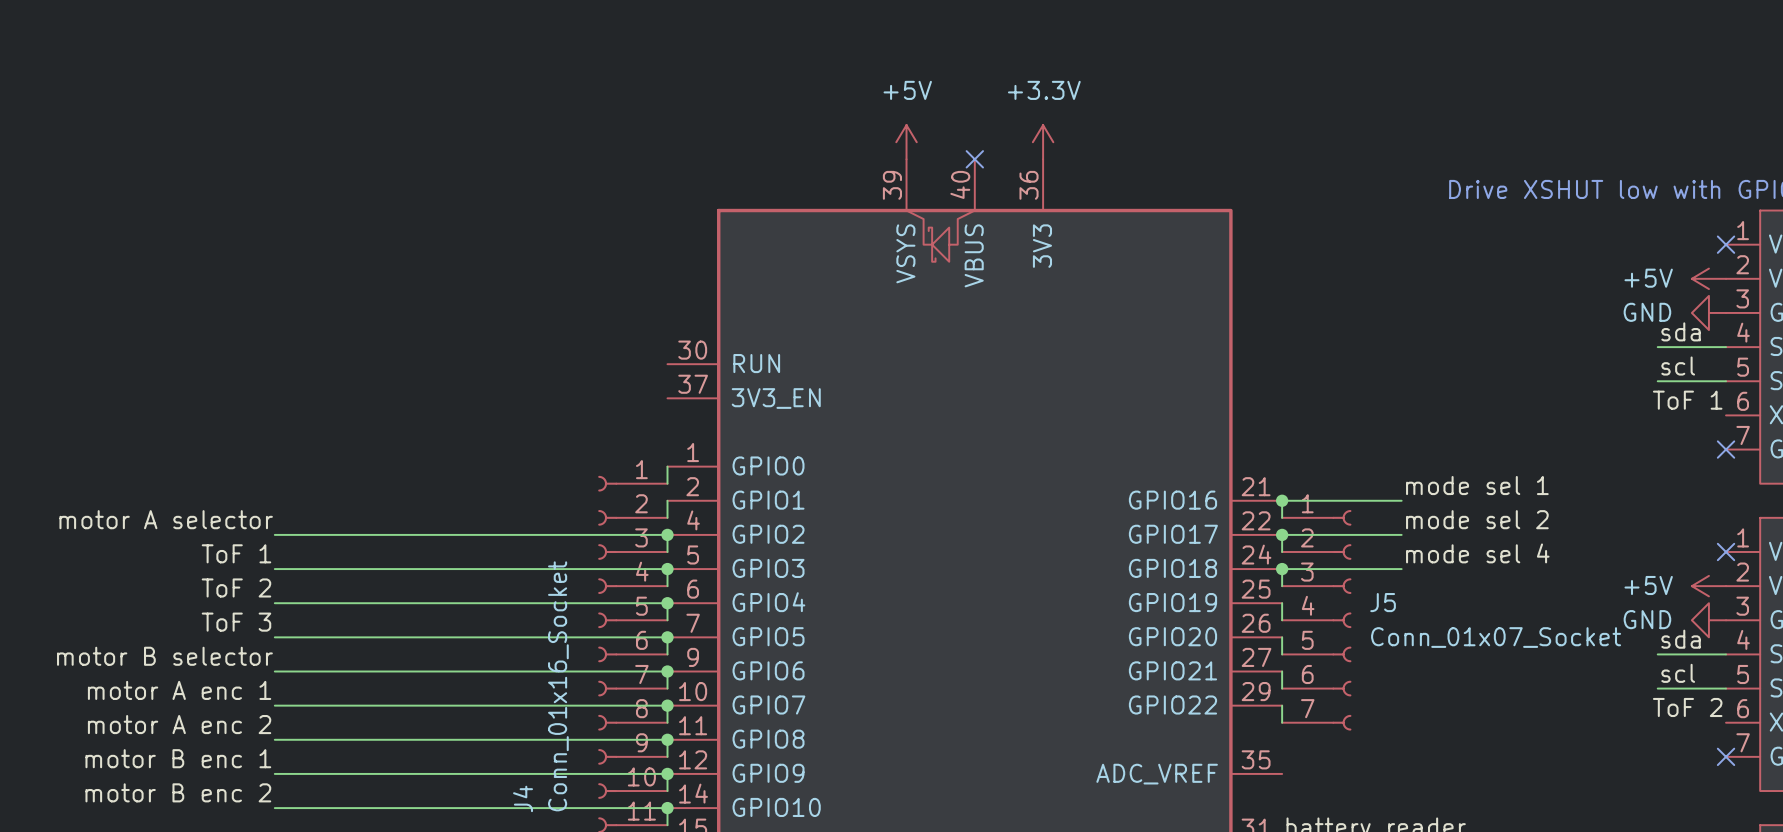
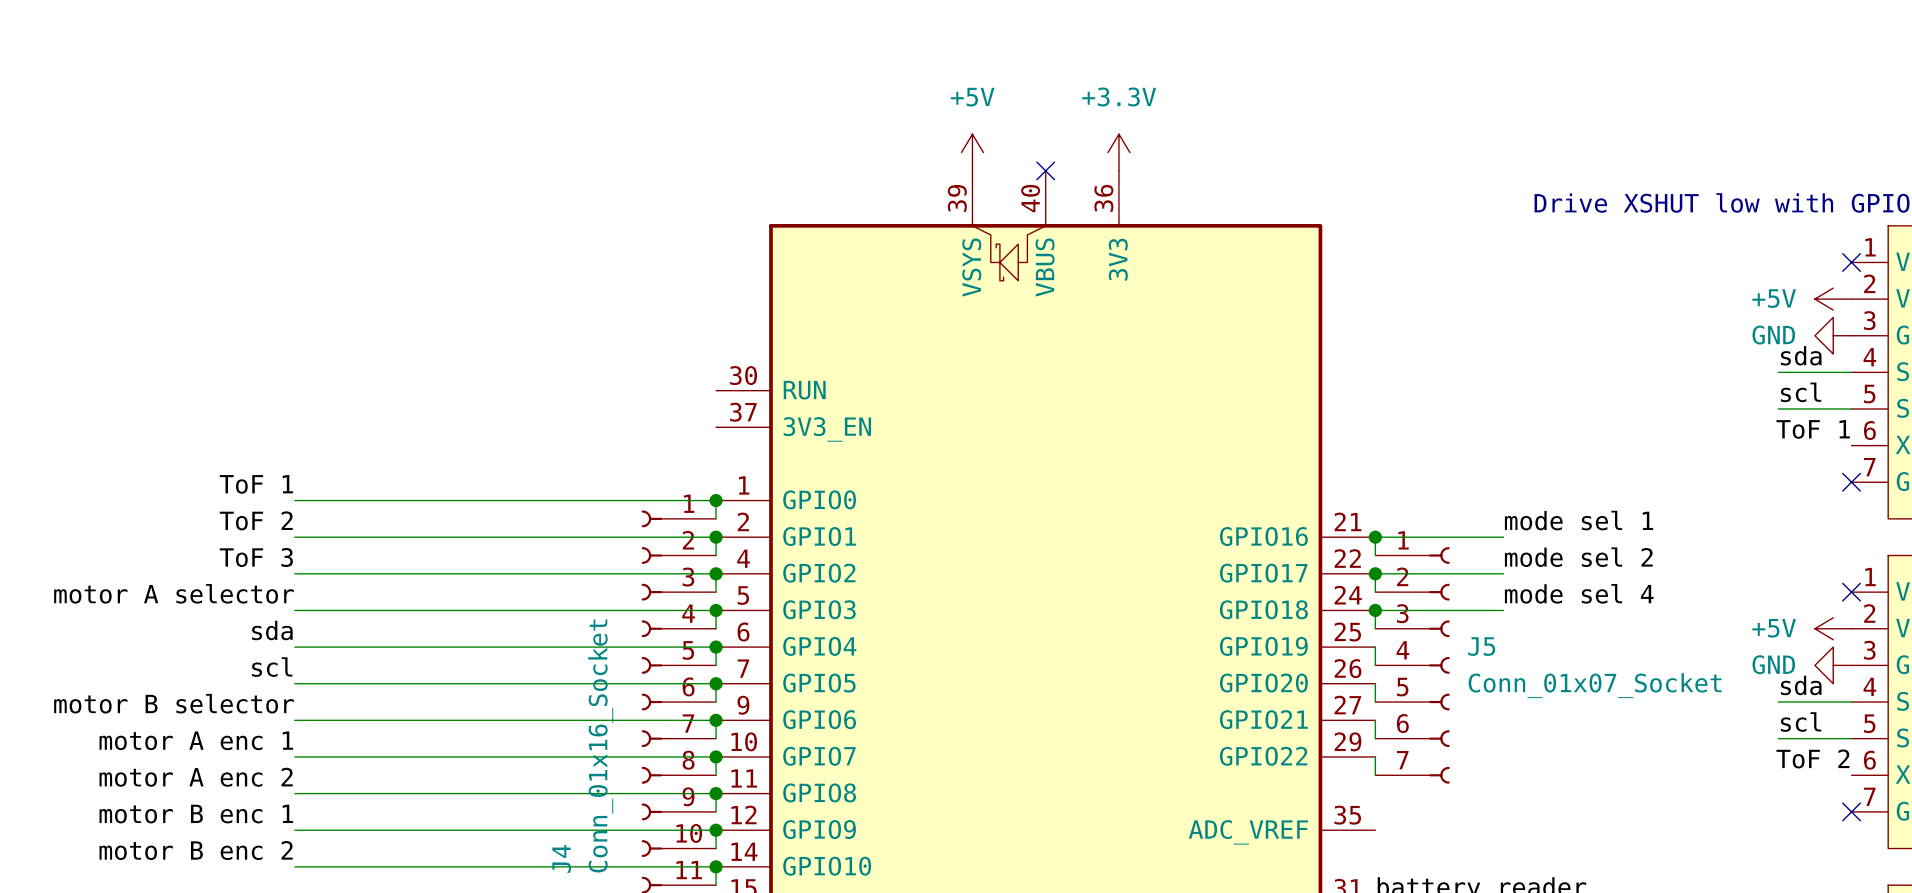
label: none -> ToF 1 (256, 484)
wire: none -> (294, 500) (716, 500)
junction: none -> (716, 500)
label: none -> ToF 2 (256, 520)
wire: none -> (294, 537) (716, 537)
junction: none -> (716, 537)
label: motor A selector (166, 519) -> ToF 3 (256, 557)
label: ToF 1 (236, 553) -> motor A selector (174, 593)
label: ToF 2 (236, 587) -> sda (272, 630)
label: ToF 3 (236, 622) -> scl (272, 667)

